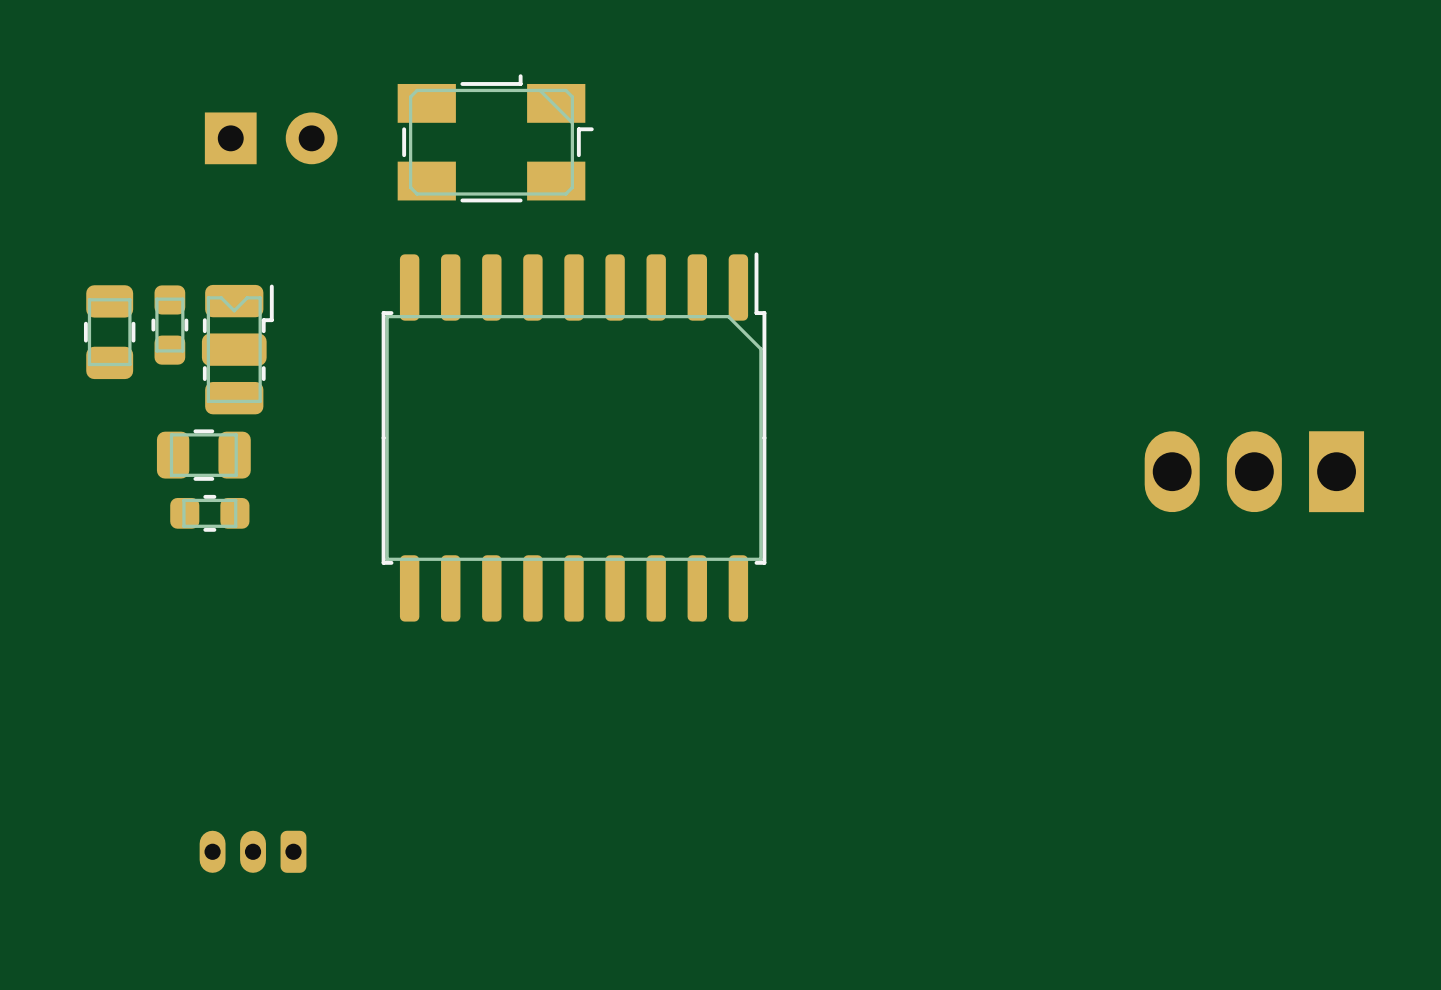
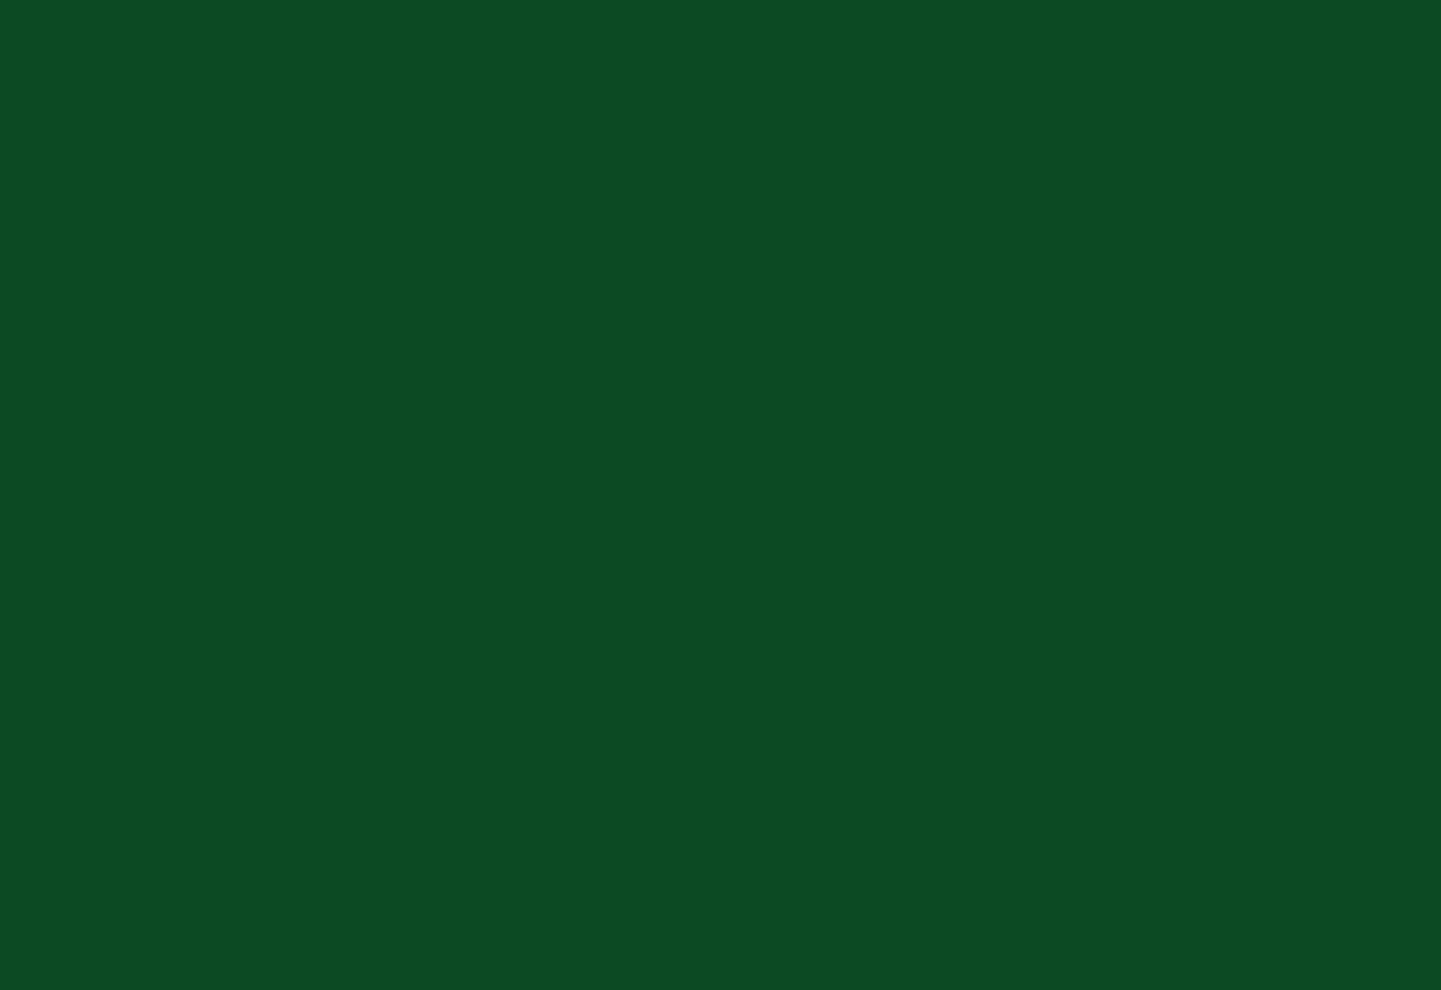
part: (271, 138) -> none
part: (495, 138) -> none
part: (169, 325) -> none
part: (109, 332) -> none
part: (237, 349) -> none
part: (574, 436) -> none
part: (203, 455) -> none
part: (1254, 471) -> none
part: (209, 513) -> none
part: (253, 851) -> none

